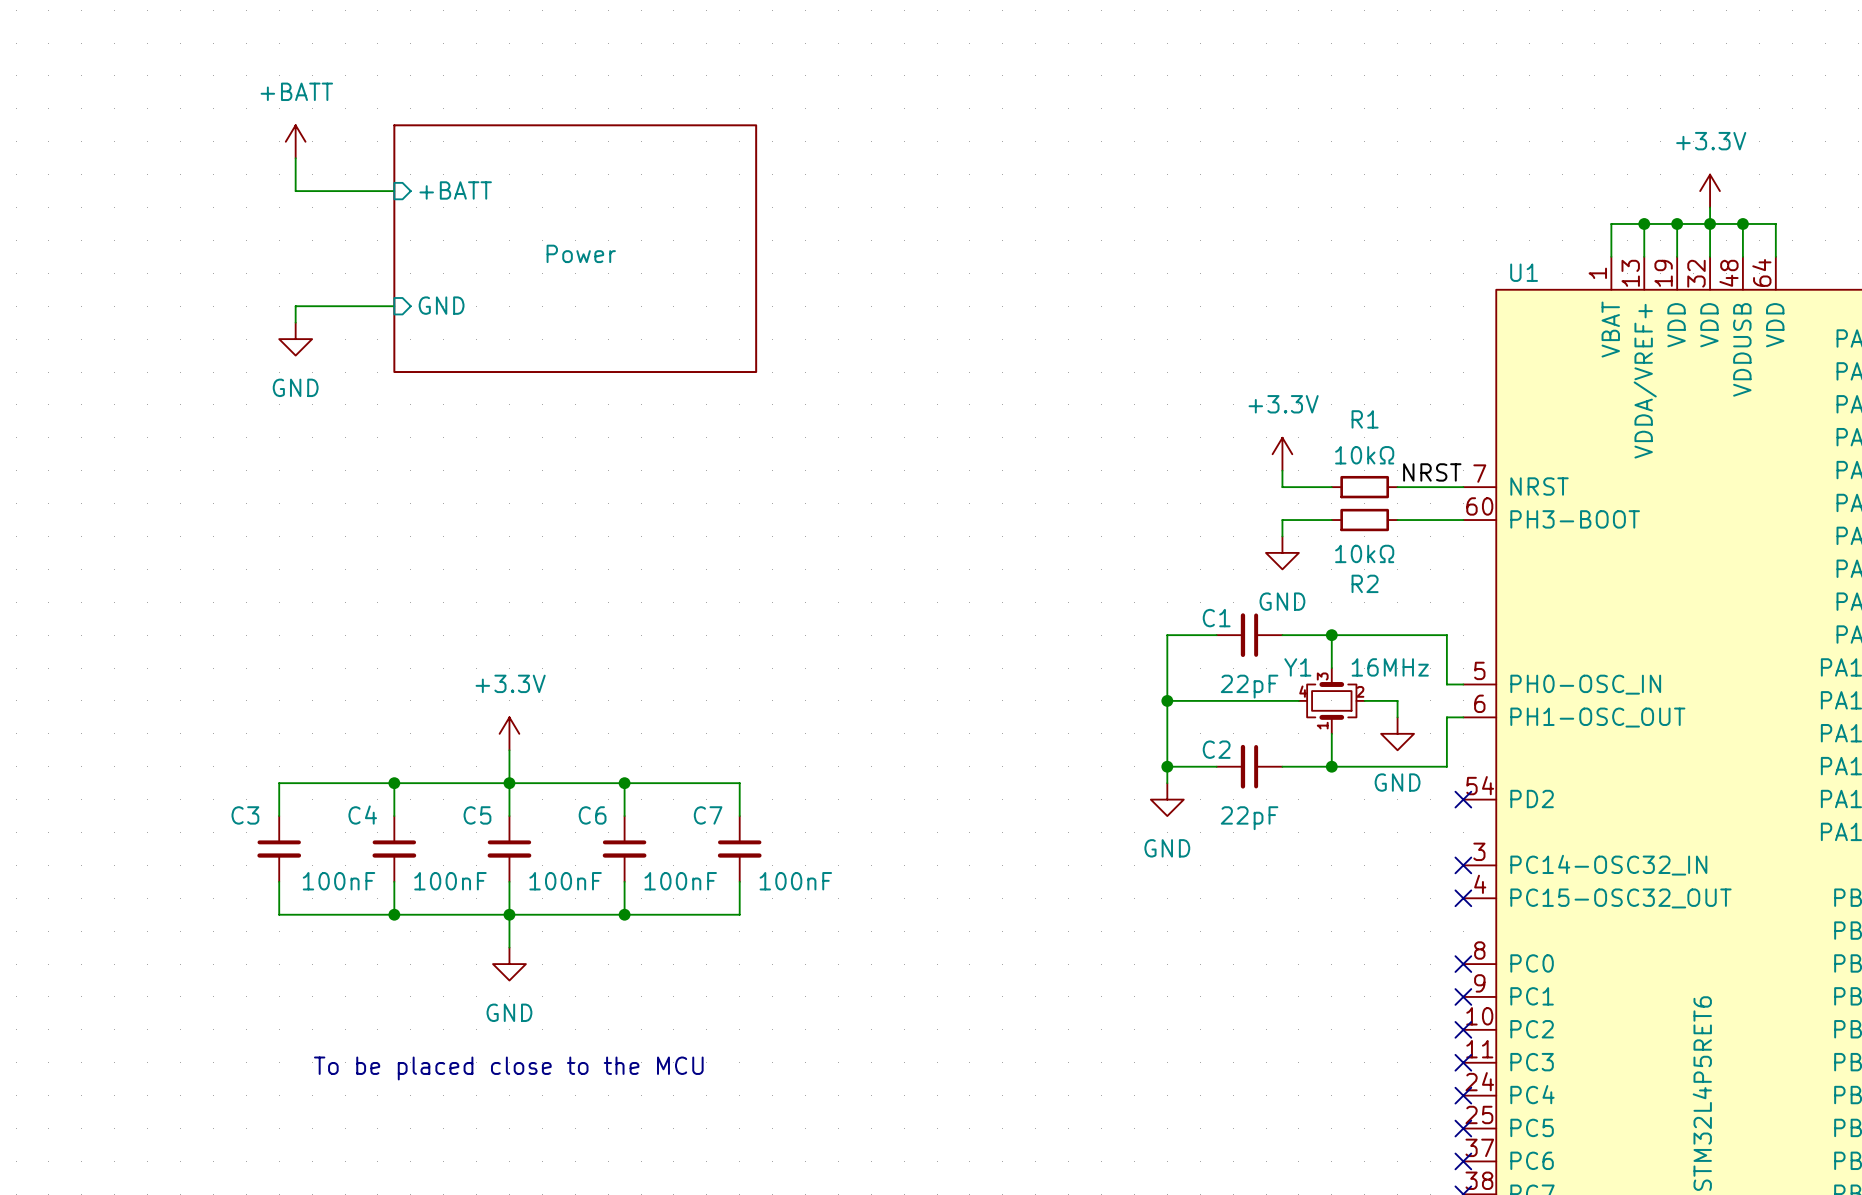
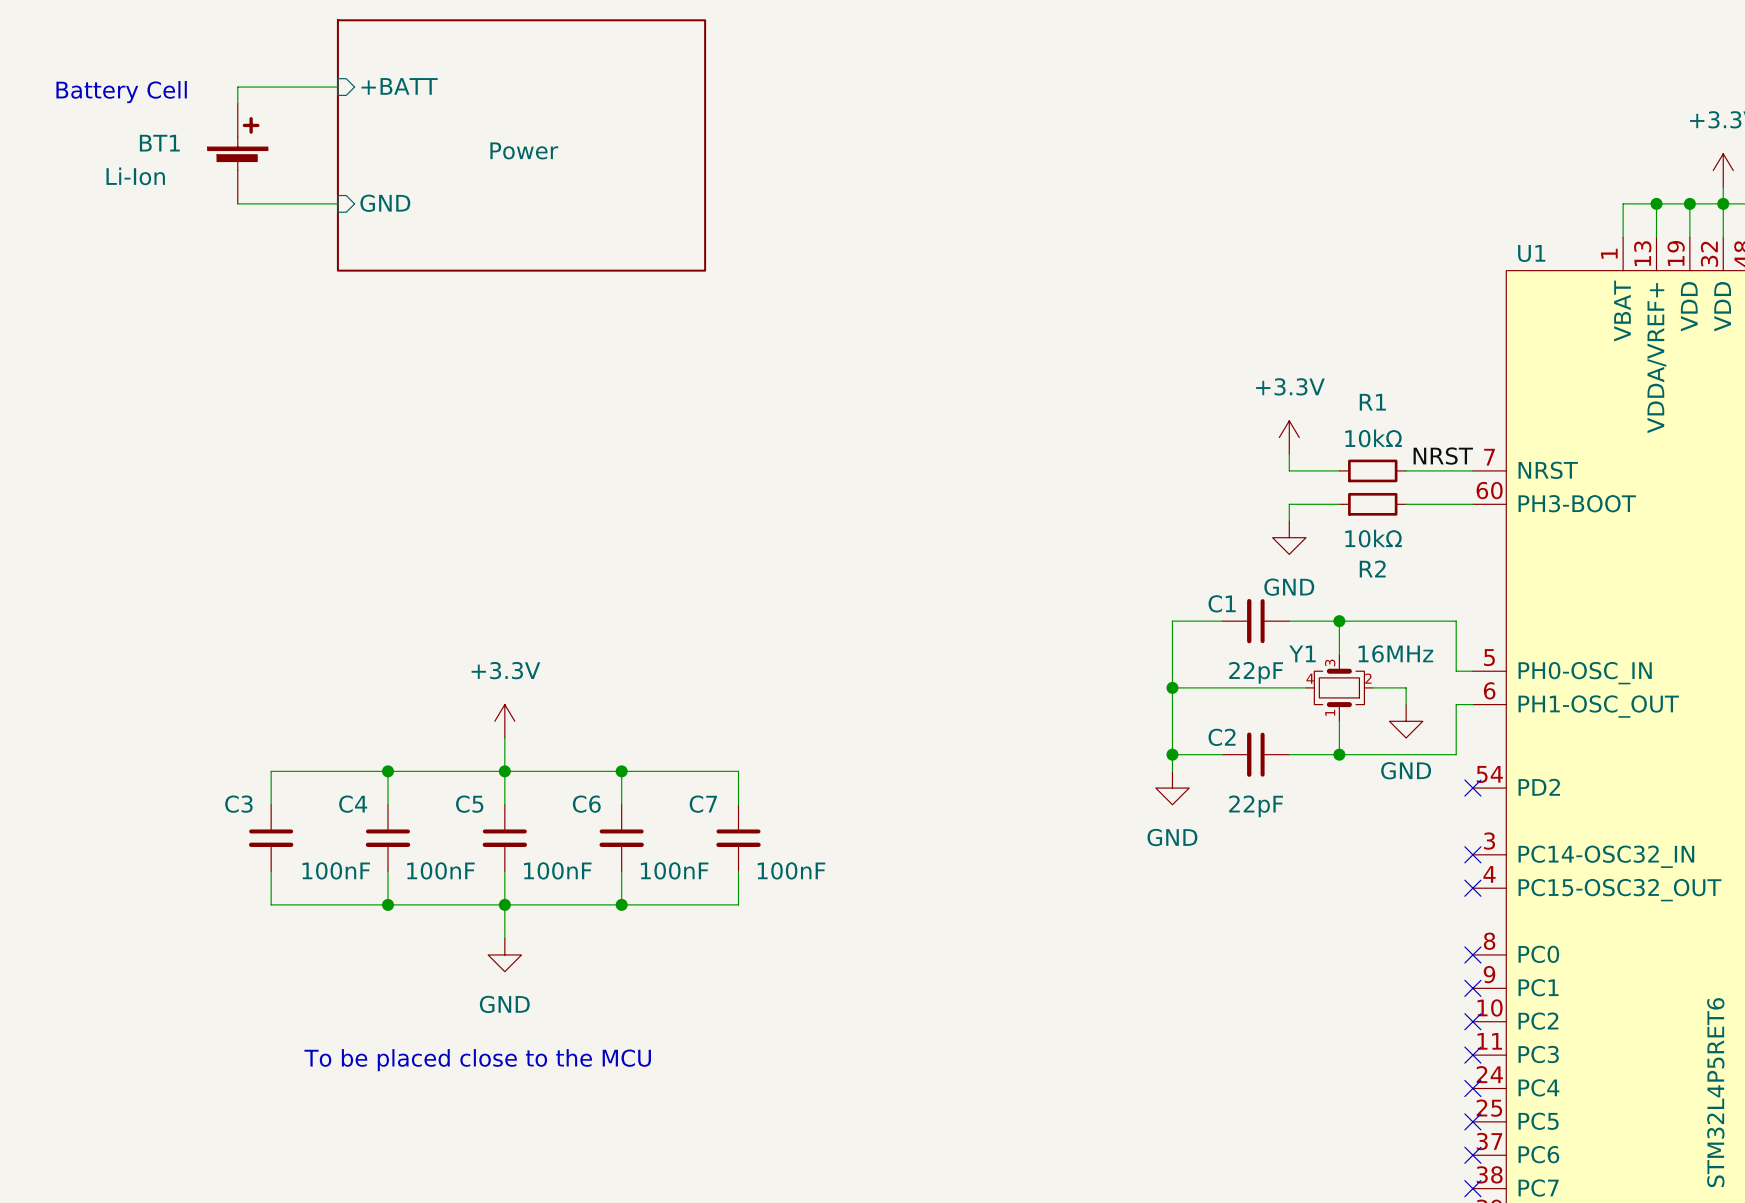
text: none -> Battery Cell (121, 92)
power symbol: +BATT (295, 141) -> none
wire: (295, 158) (295, 191) (394, 191) -> none
BT1: none -> Li-Ion (237, 153)
sheet pin position: +BATT (455, 190) -> +BATT (399, 86)
wire: none -> (237, 203) (337, 203)
sheet Power position: (575, 248) -> (521, 145)
sheet pin position: GND (441, 305) -> GND (385, 203)
wire: (394, 306) (295, 306) (295, 322) -> (337, 87) (237, 87) (237, 103)
power symbol: GND (295, 339) -> none

